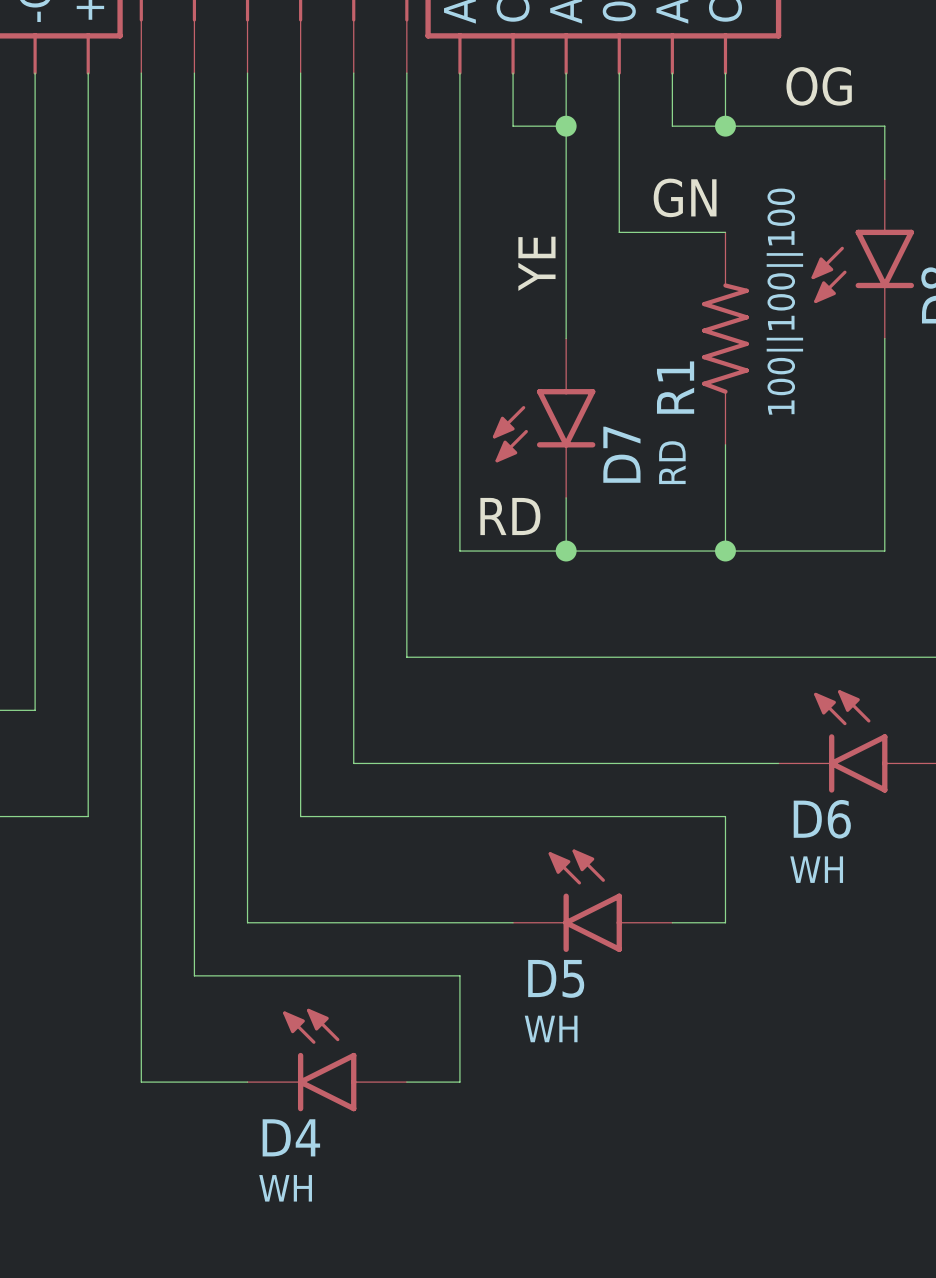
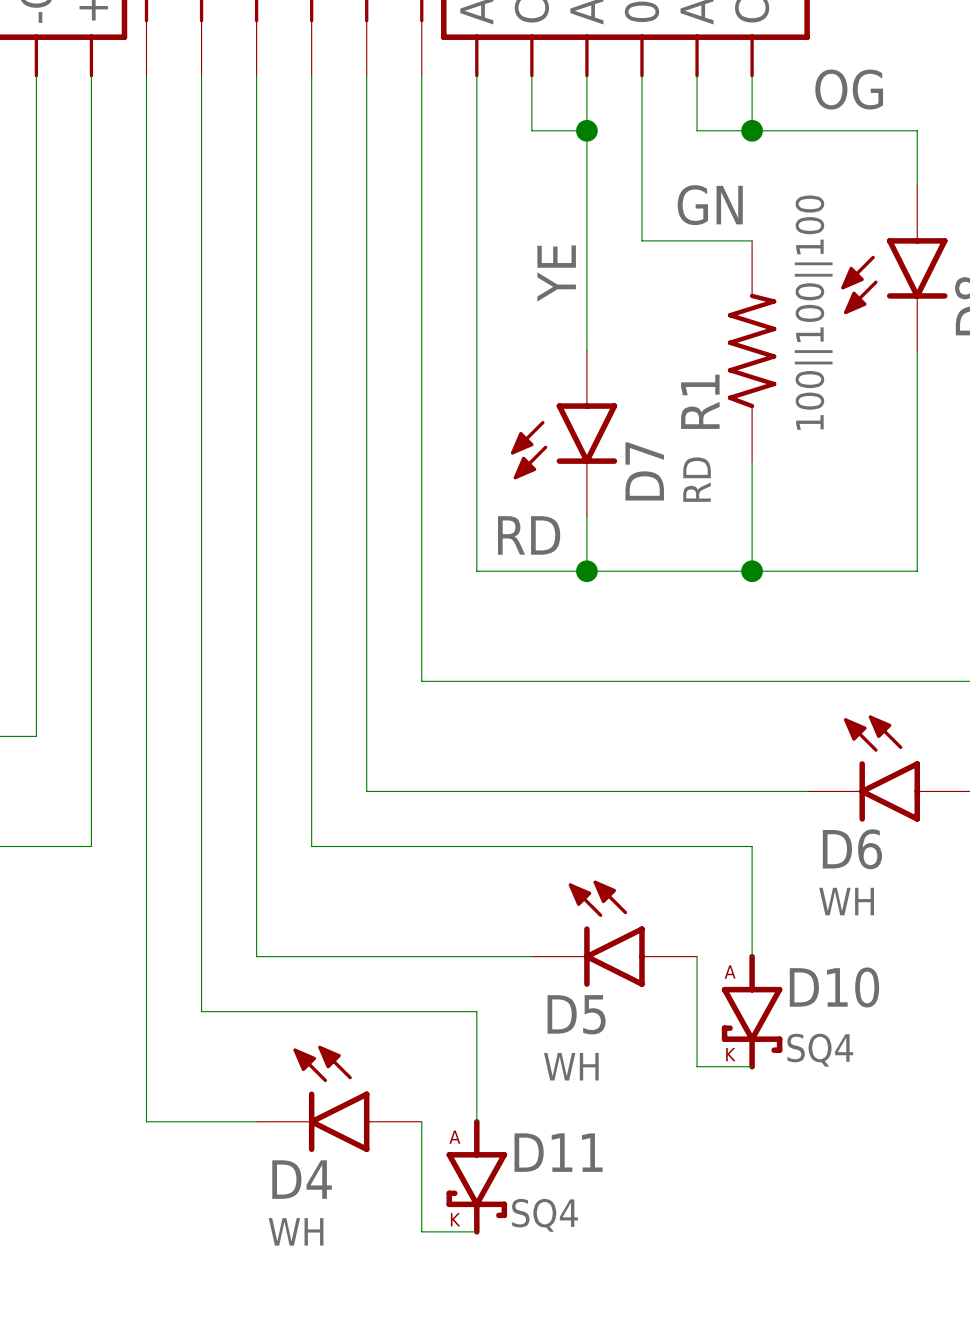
wire: (672, 922) (725, 922) -> (697, 956) (697, 1066) (752, 1066)
D10: none -> SQ4 (752, 1011)
wire: (406, 1082) (459, 1082) -> (421, 1121) (421, 1231) (476, 1231)
D11: none -> SQ4 (476, 1176)

